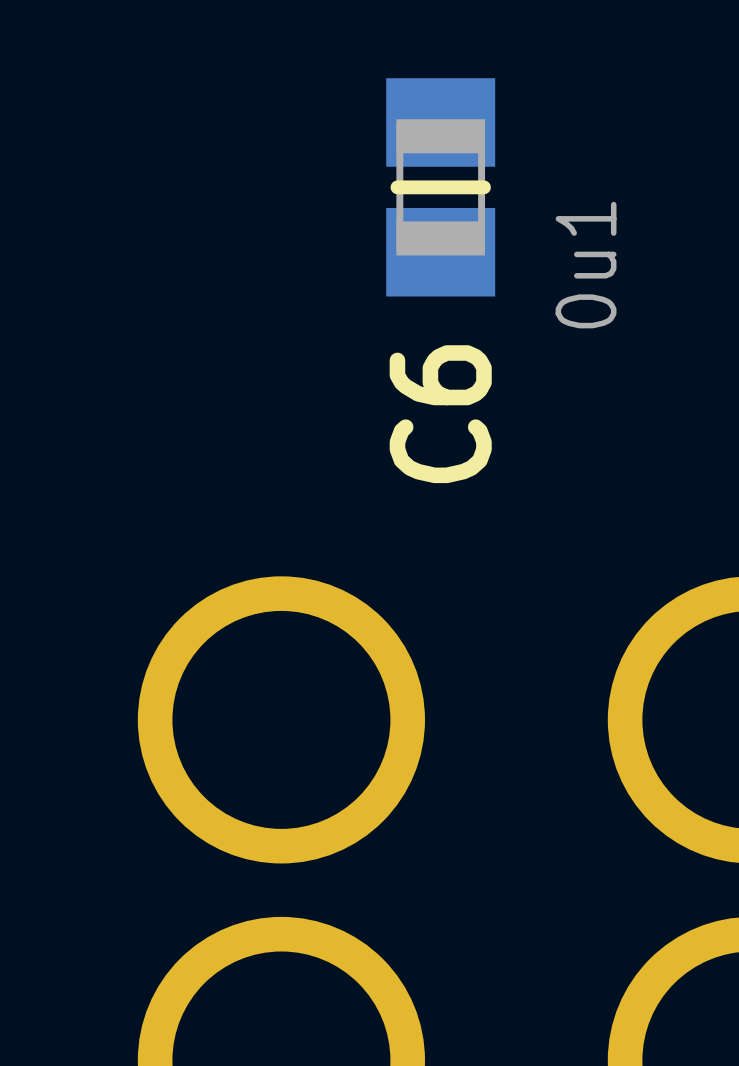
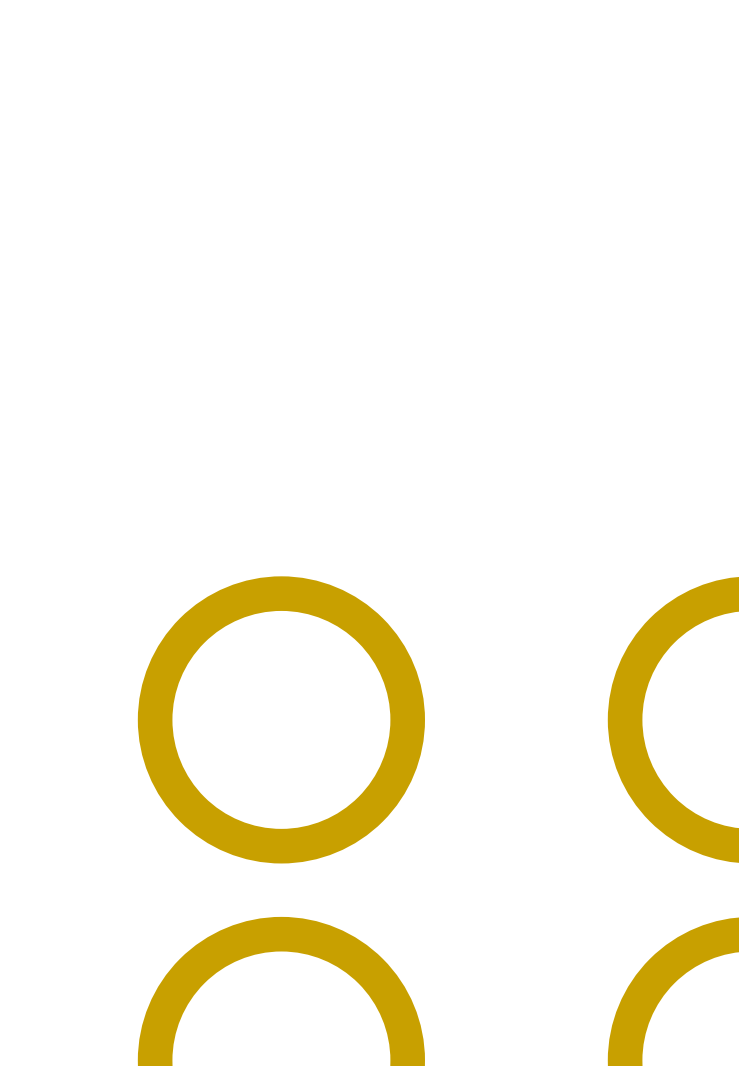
C6: 0u1 (440, 187) -> none

